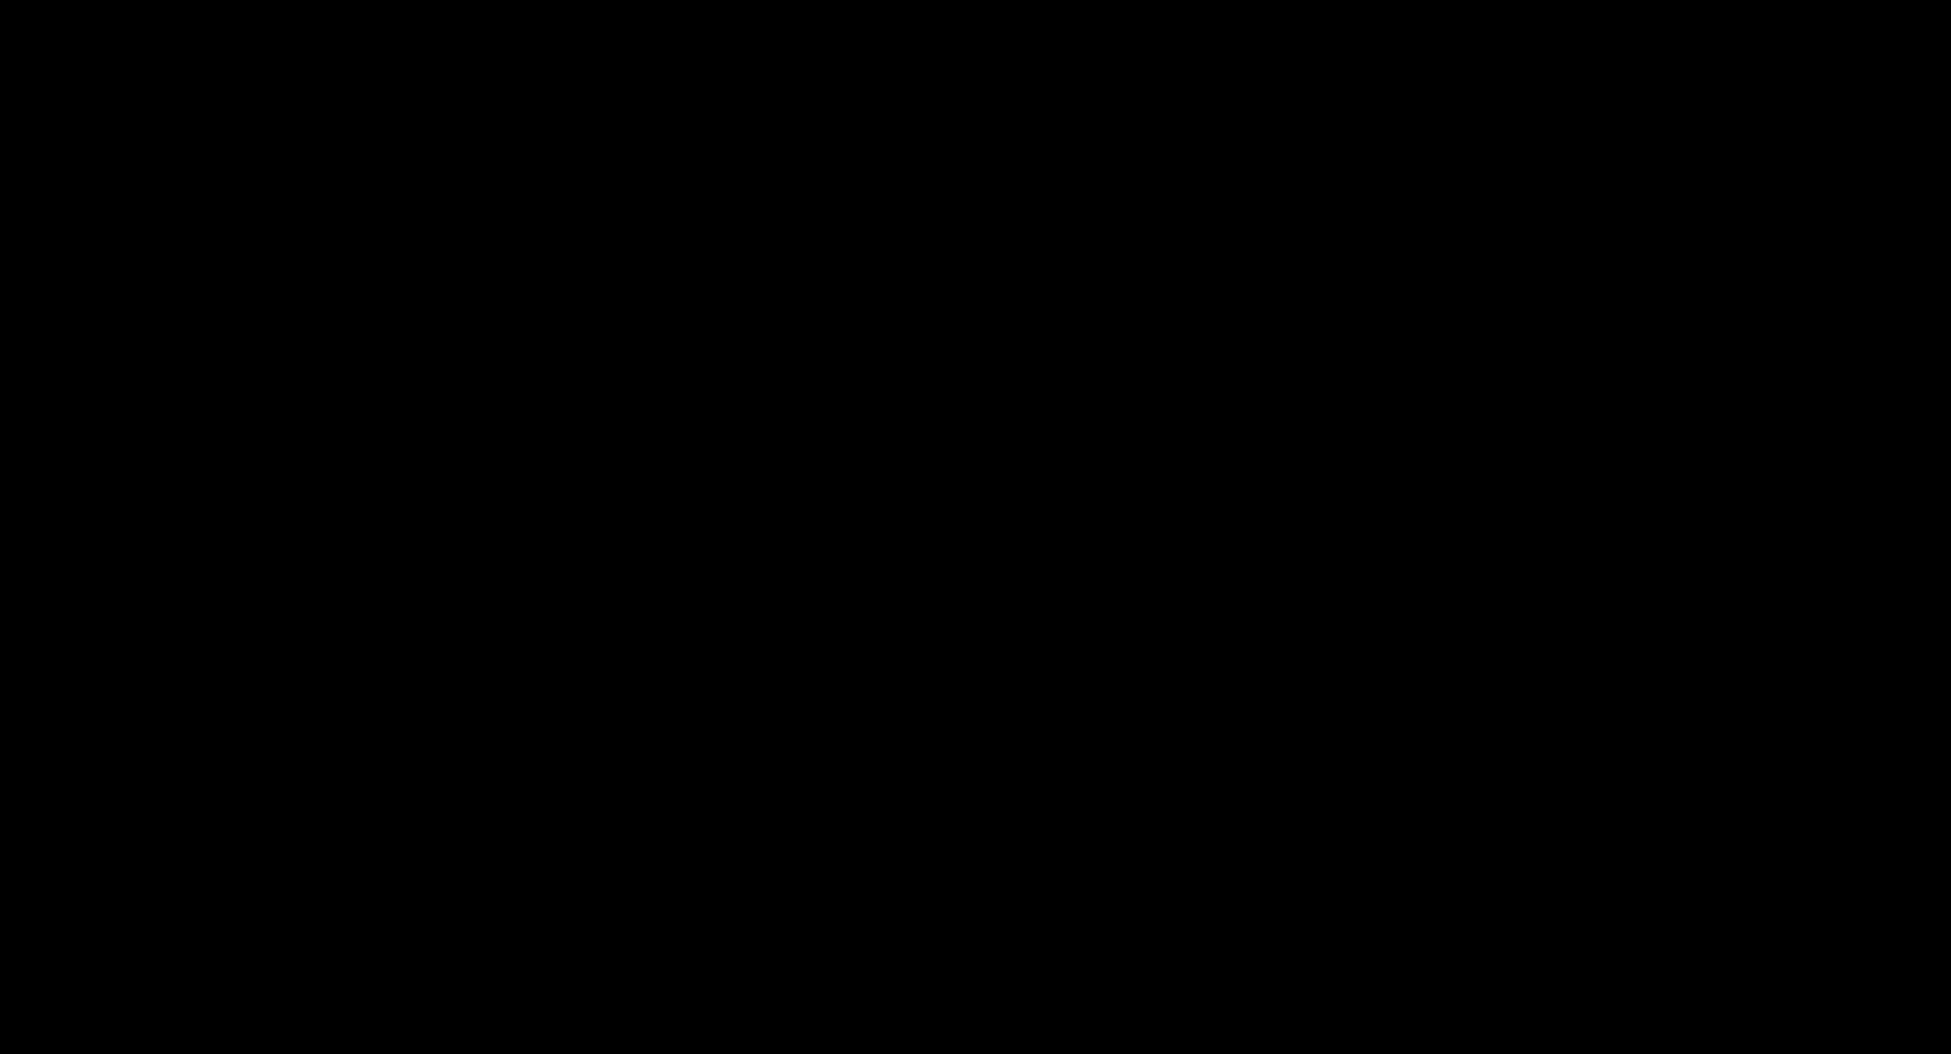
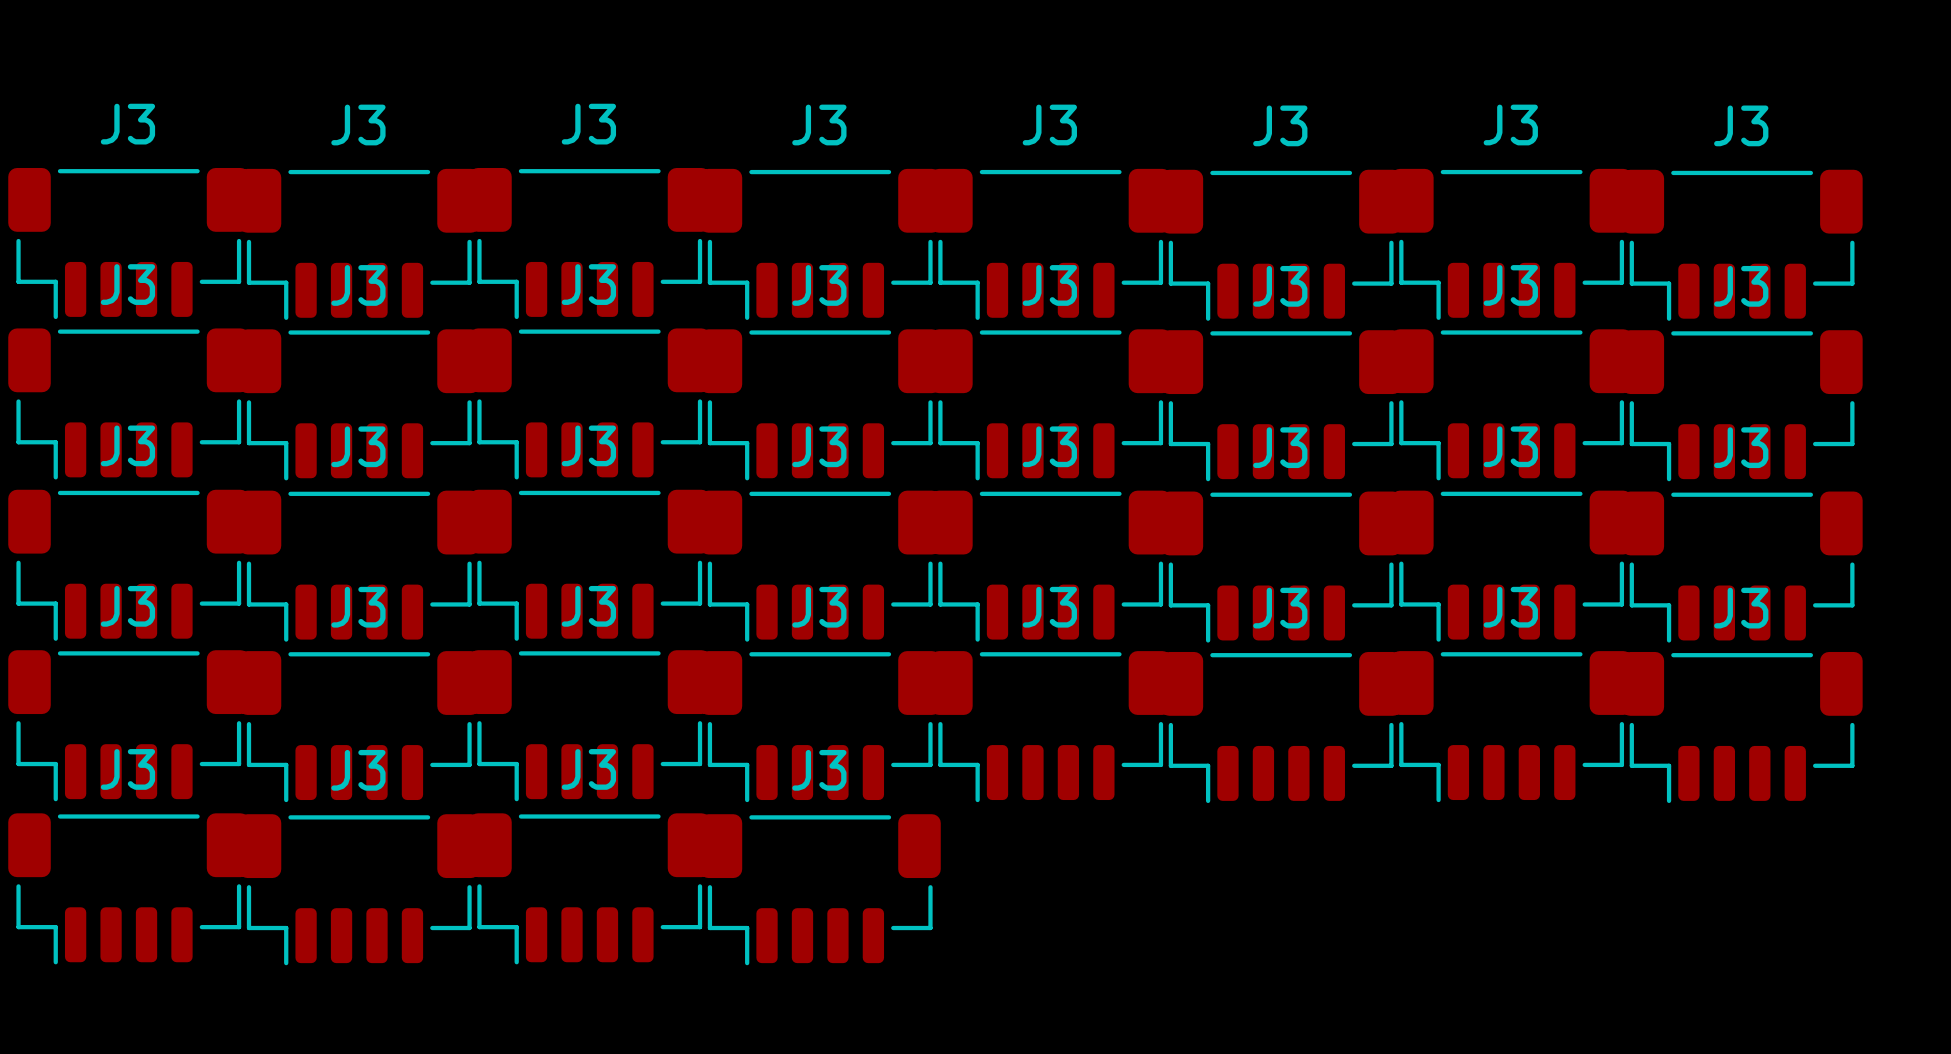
J3: none -> (128, 243)
J3: none -> (589, 243)
J3: none -> (359, 244)
J3: none -> (820, 244)
J3: none -> (1050, 244)
J3: none -> (1511, 244)
J3: none -> (1281, 245)
J3: none -> (1742, 245)
J3: none -> (128, 403)
J3: none -> (589, 403)
J3: none -> (359, 404)
J3: none -> (820, 404)
J3: none -> (1050, 404)
J3: none -> (1511, 404)
J3: none -> (1281, 405)
J3: none -> (1742, 405)
J3: none -> (128, 565)
J3: none -> (589, 565)
J3: none -> (359, 566)
J3: none -> (820, 566)
J3: none -> (1050, 566)
J3: none -> (1511, 566)
J3: none -> (1281, 567)
J3: none -> (1742, 567)
J3: none -> (128, 725)
J3: none -> (589, 725)
J3: none -> (359, 726)
J3: none -> (820, 726)
J3: none -> (1050, 726)
J3: none -> (1511, 726)
J3: none -> (1281, 727)
J3: none -> (1742, 727)
J3: none -> (128, 888)
J3: none -> (589, 888)
J3: none -> (359, 889)
J3: none -> (820, 889)

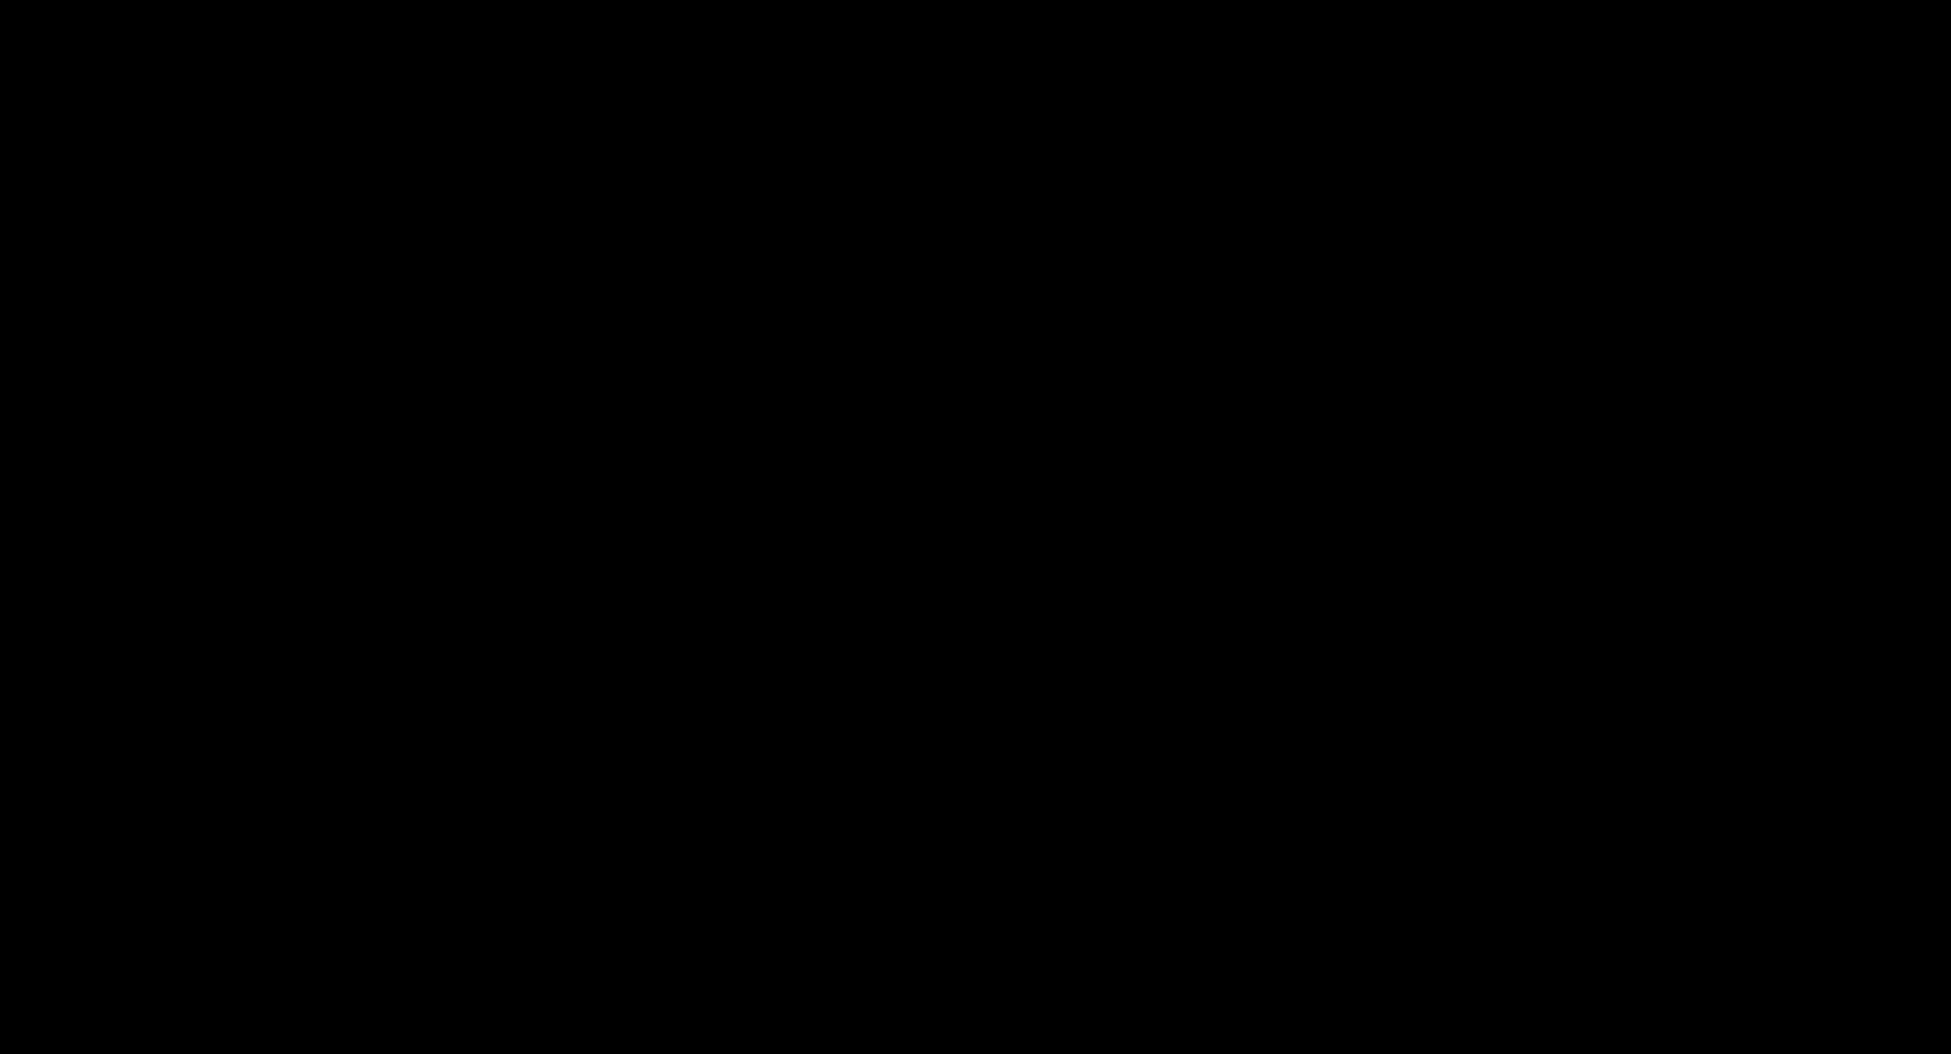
J3: (128, 243) -> none
J3: (589, 243) -> none
J3: (359, 244) -> none
J3: (820, 244) -> none
J3: (1050, 244) -> none
J3: (1511, 244) -> none
J3: (1281, 245) -> none
J3: (1742, 245) -> none
J3: (128, 403) -> none
J3: (589, 403) -> none
J3: (359, 404) -> none
J3: (820, 404) -> none
J3: (1050, 404) -> none
J3: (1511, 404) -> none
J3: (1281, 405) -> none
J3: (1742, 405) -> none
J3: (128, 565) -> none
J3: (589, 565) -> none
J3: (359, 566) -> none
J3: (820, 566) -> none
J3: (1050, 566) -> none
J3: (1511, 566) -> none
J3: (1281, 567) -> none
J3: (1742, 567) -> none
J3: (128, 725) -> none
J3: (589, 725) -> none
J3: (359, 726) -> none
J3: (820, 726) -> none
J3: (1050, 726) -> none
J3: (1511, 726) -> none
J3: (1281, 727) -> none
J3: (1742, 727) -> none
J3: (128, 888) -> none
J3: (589, 888) -> none
J3: (359, 889) -> none
J3: (820, 889) -> none

